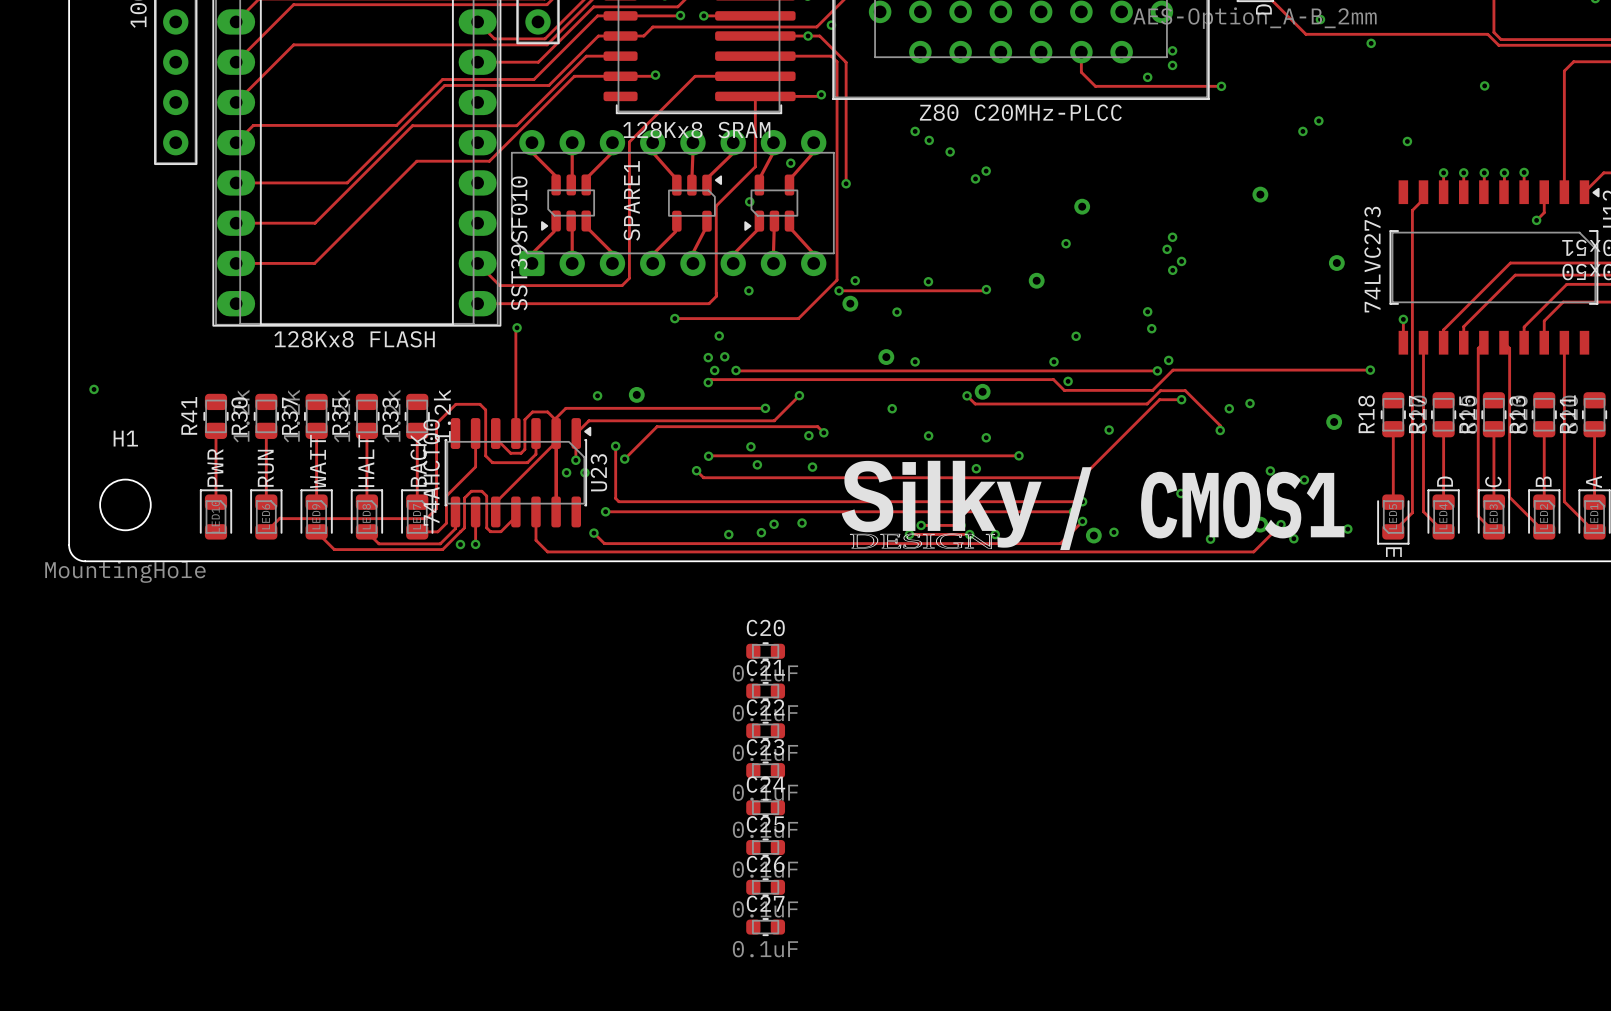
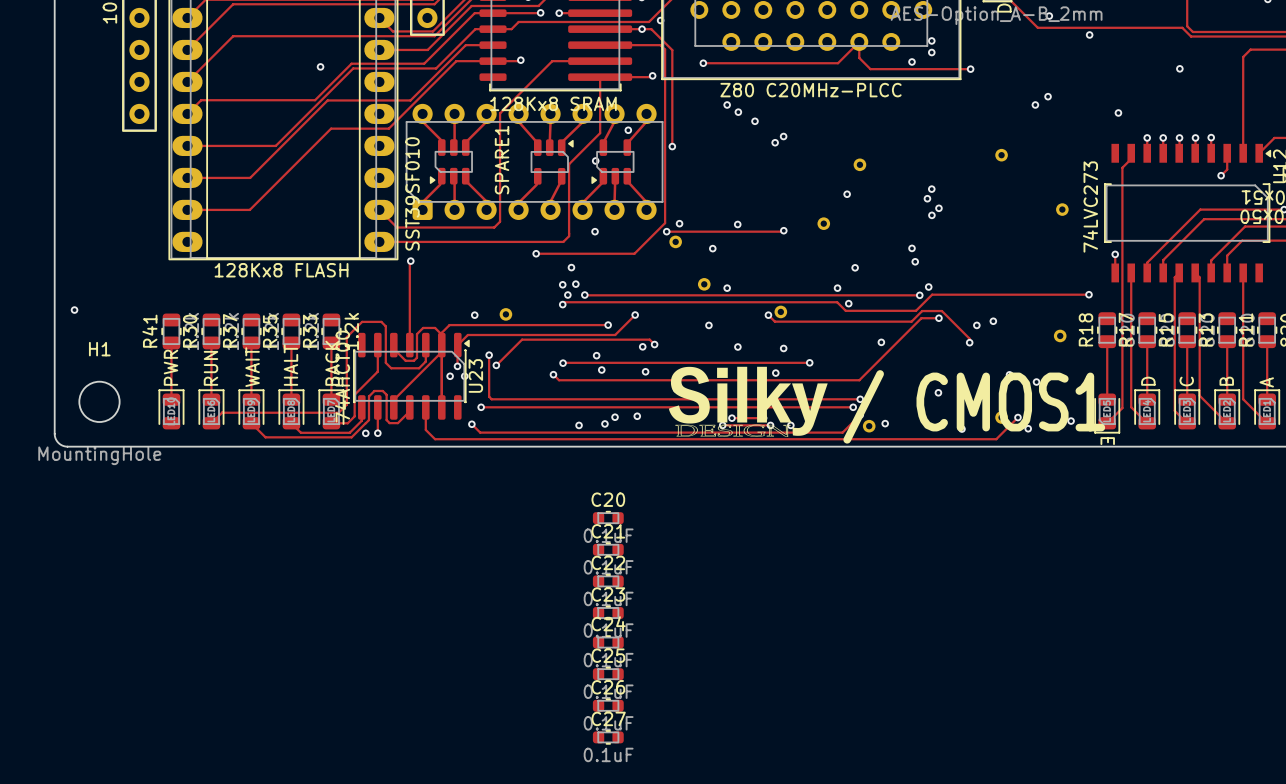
track: none -> (859, 41) (838, 63) (703, 63)
via: none -> (703, 63)
via: none -> (320, 66)

